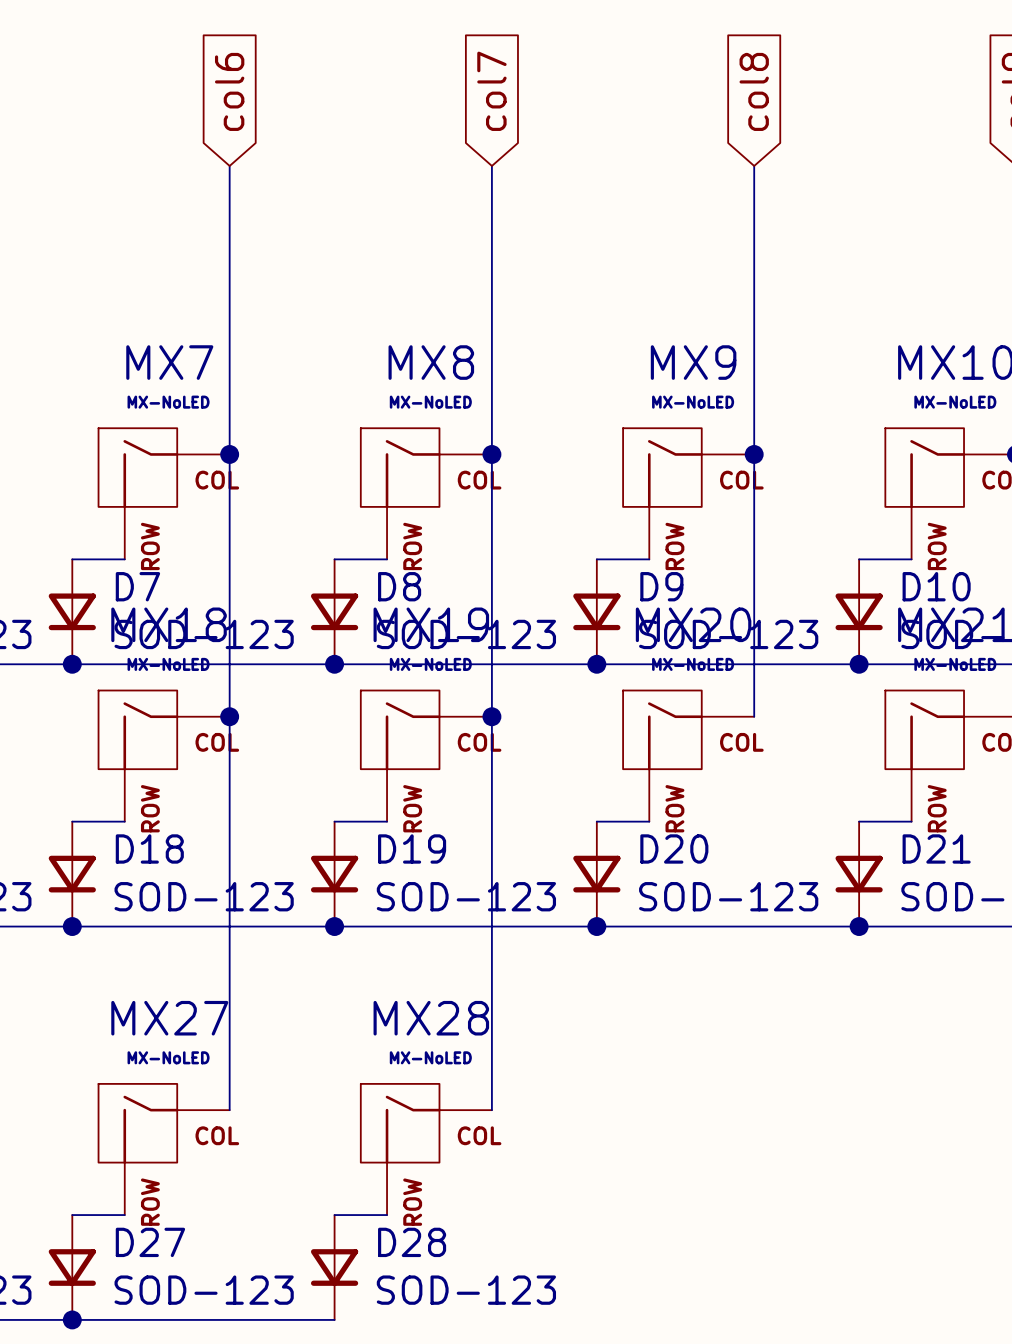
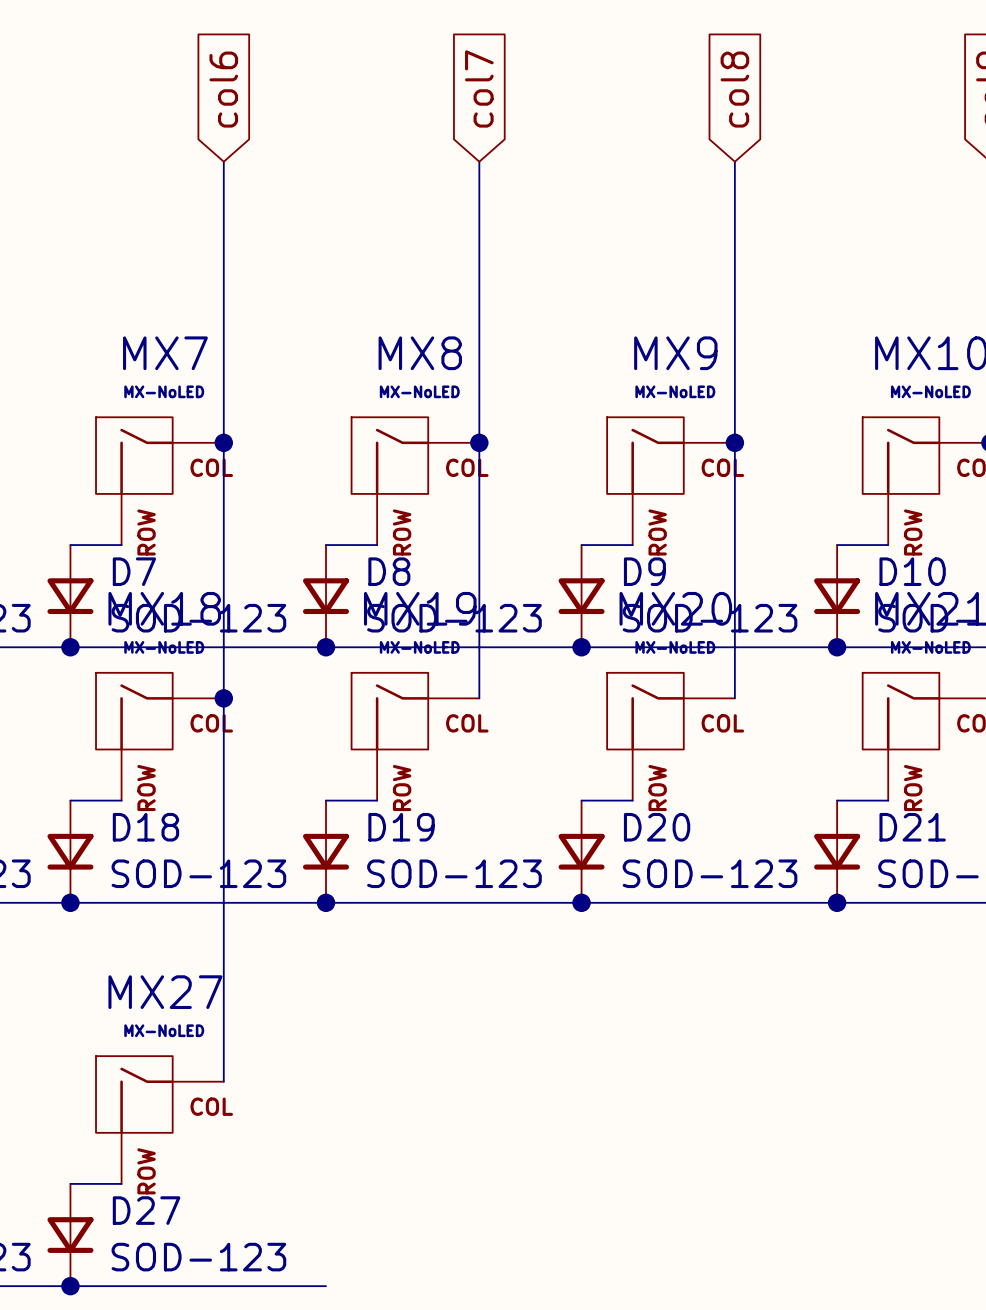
wire: (491, 716) (491, 1110) -> none
junction: (491, 716) -> none
MX28: MX-NoLED (426, 1149) -> none
wire: (334, 1215) (387, 1215) -> none
D28: SOD-123 (334, 1267) -> none

